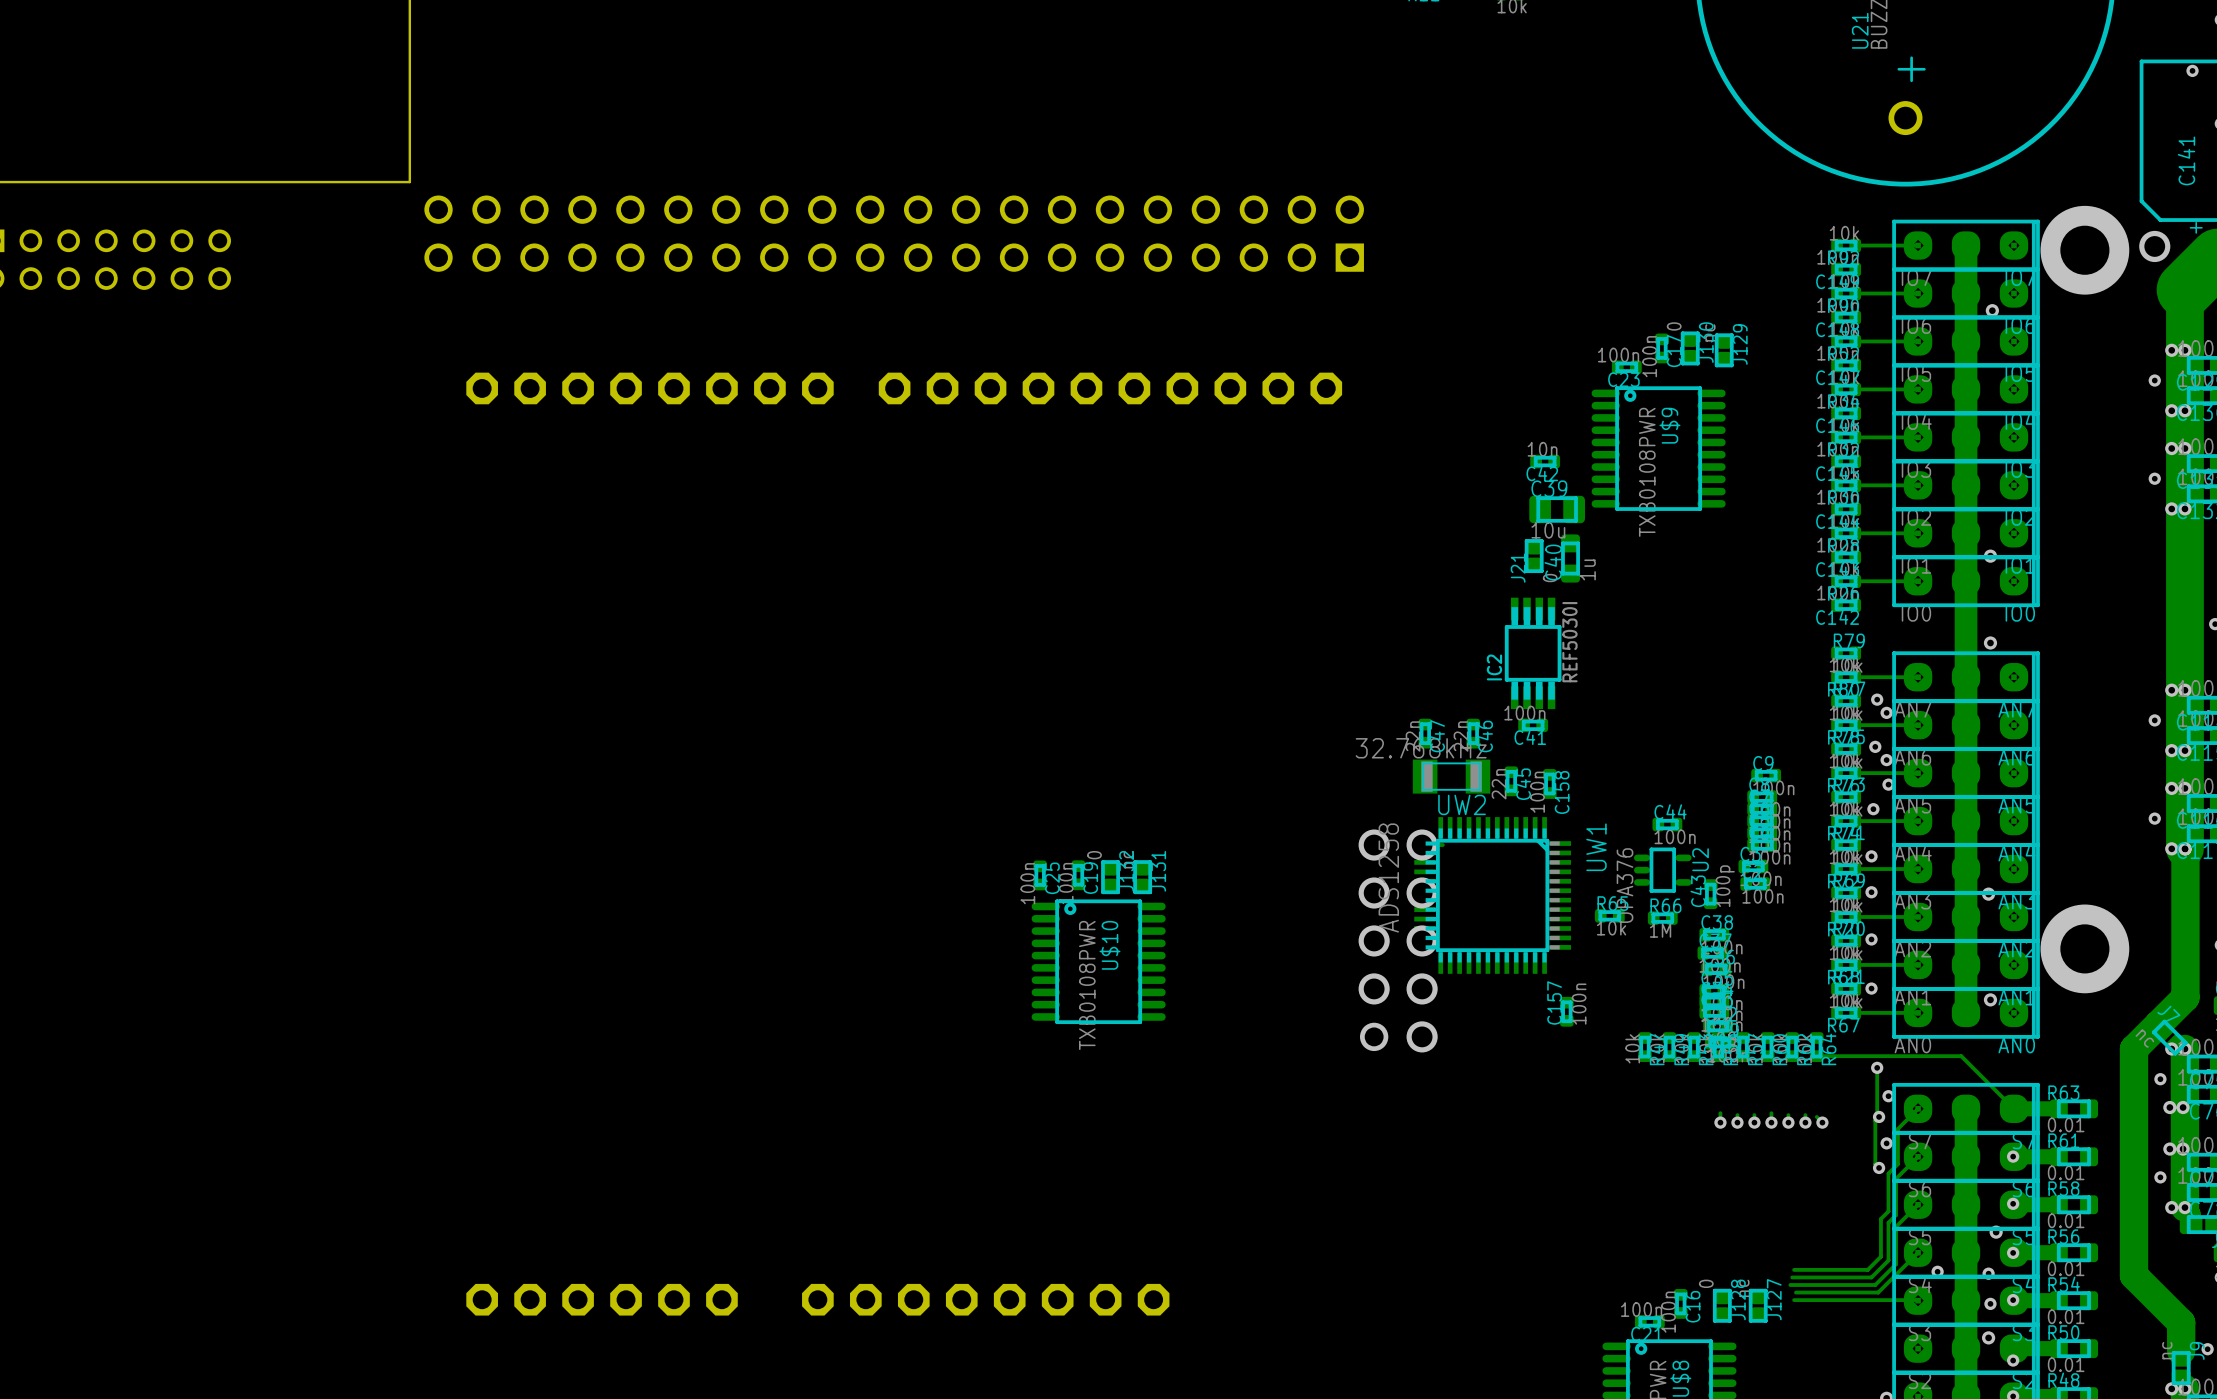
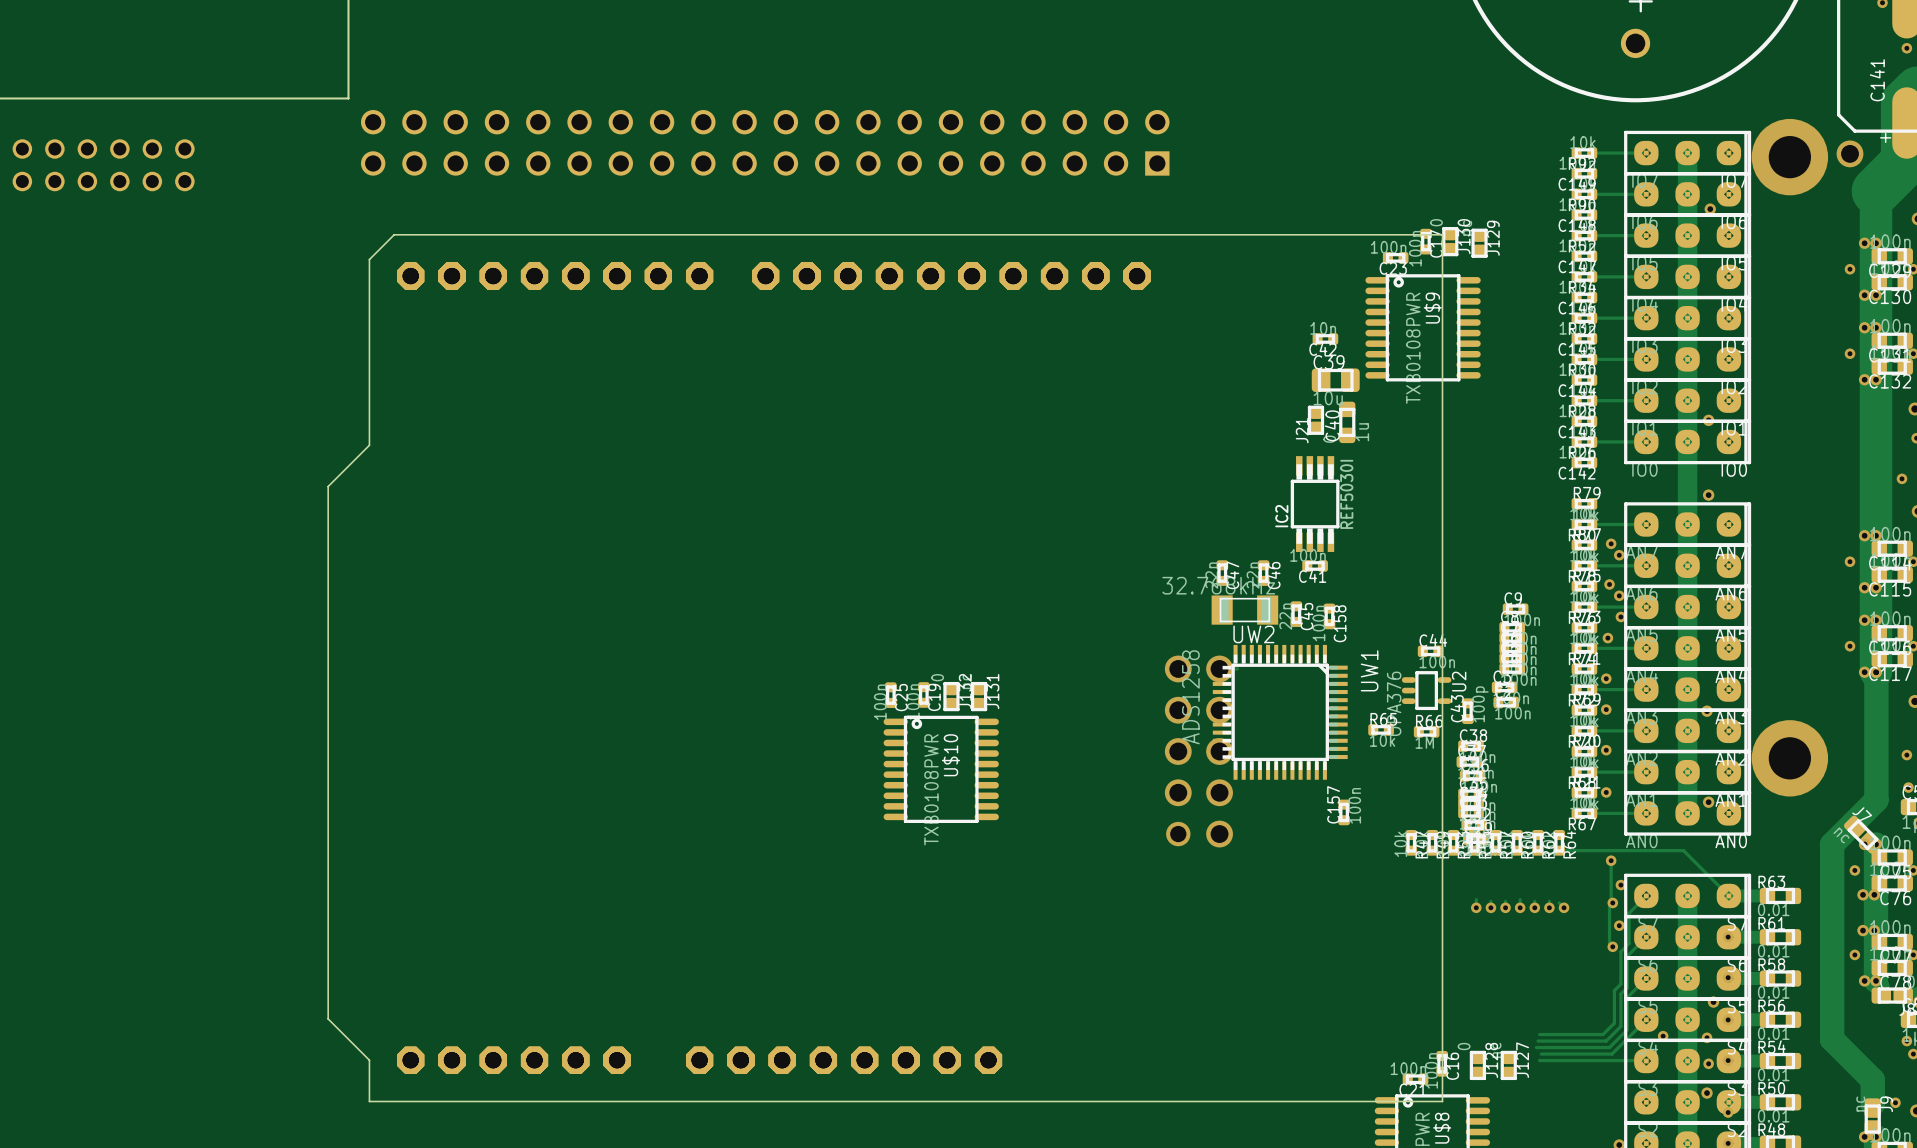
part: none -> (885, 668)

